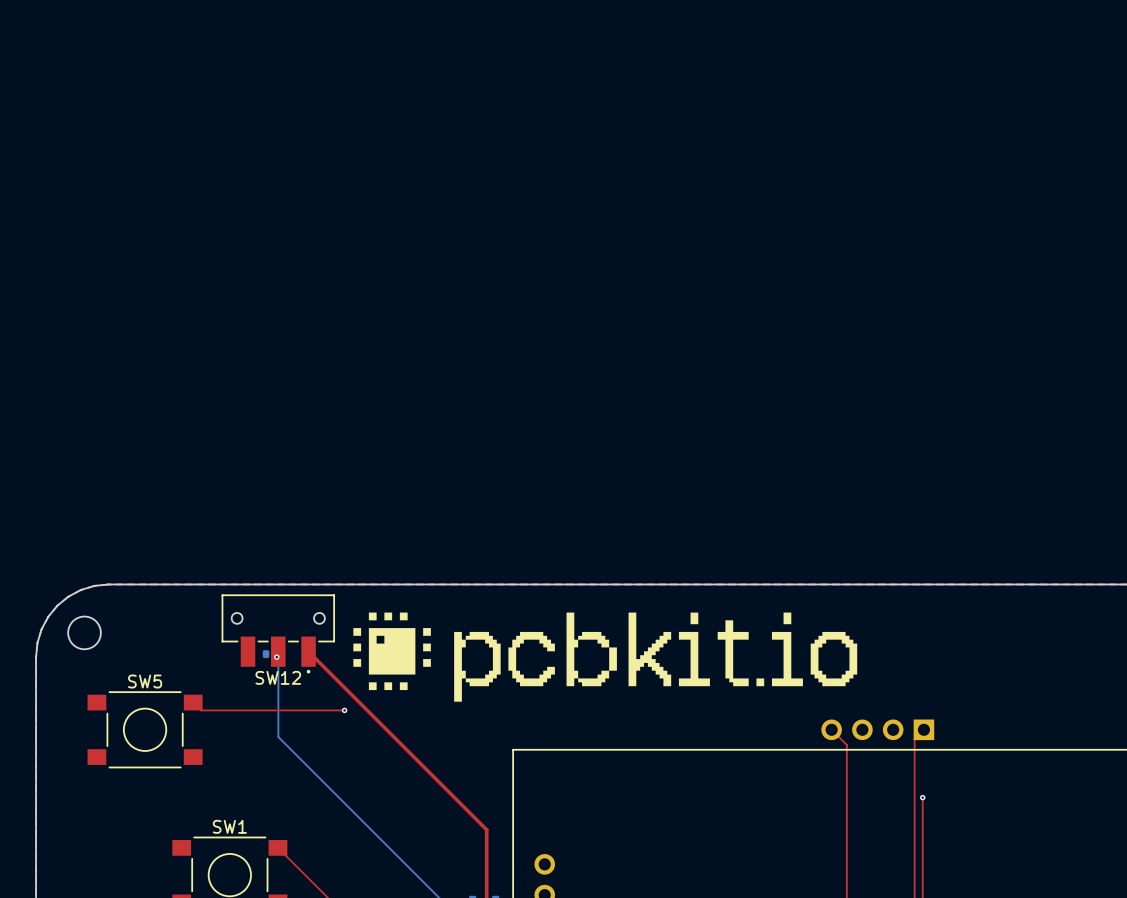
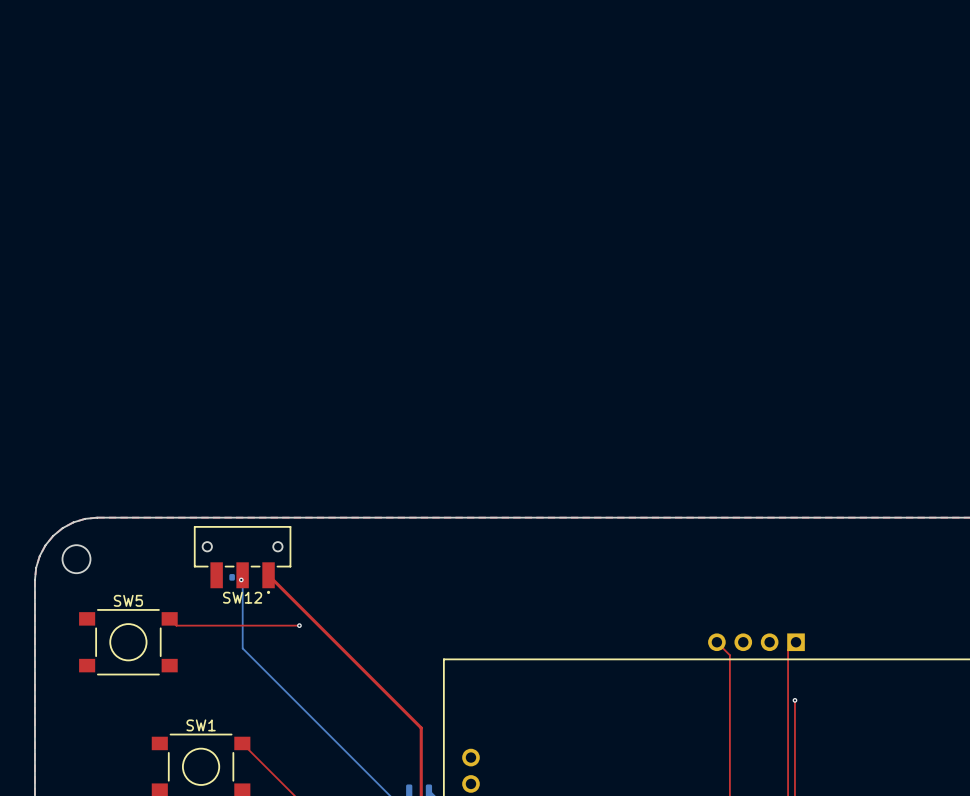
drawing: [353, 612, 858, 702] -> none

